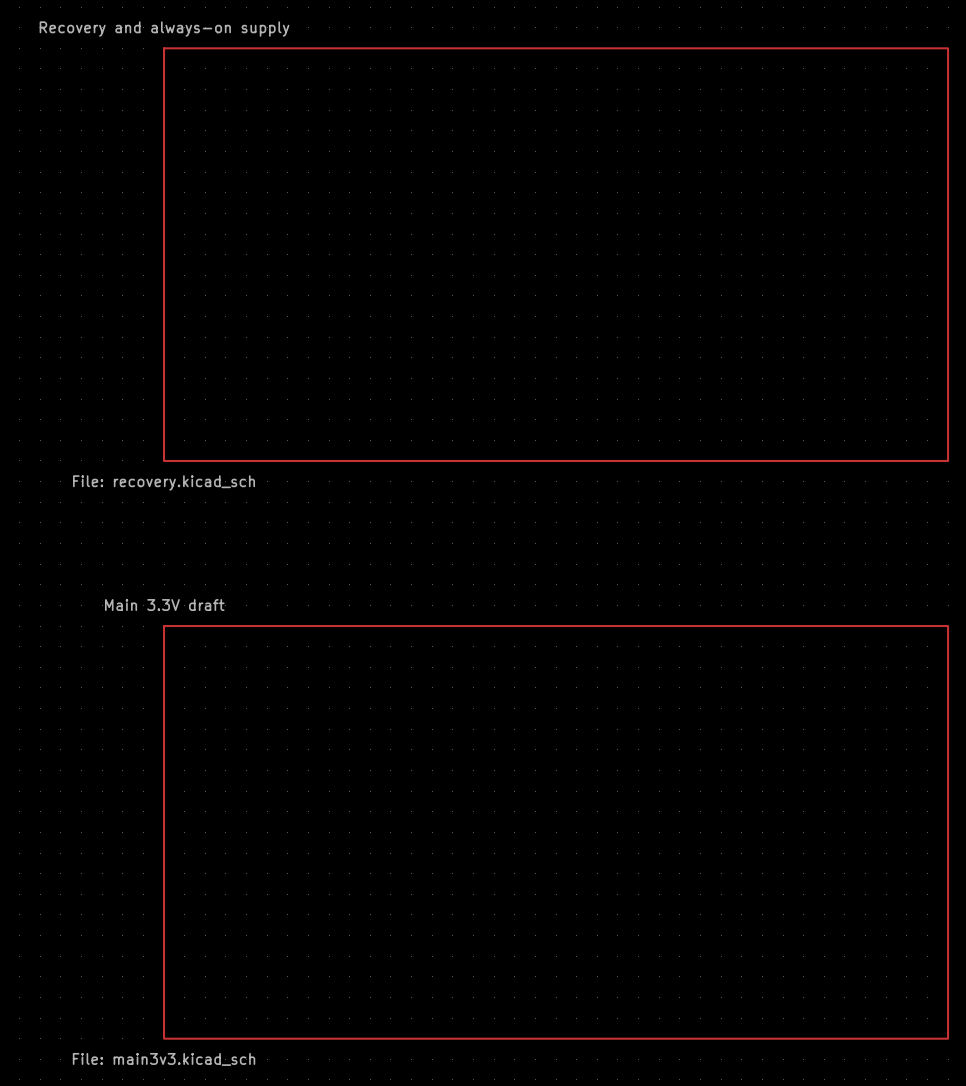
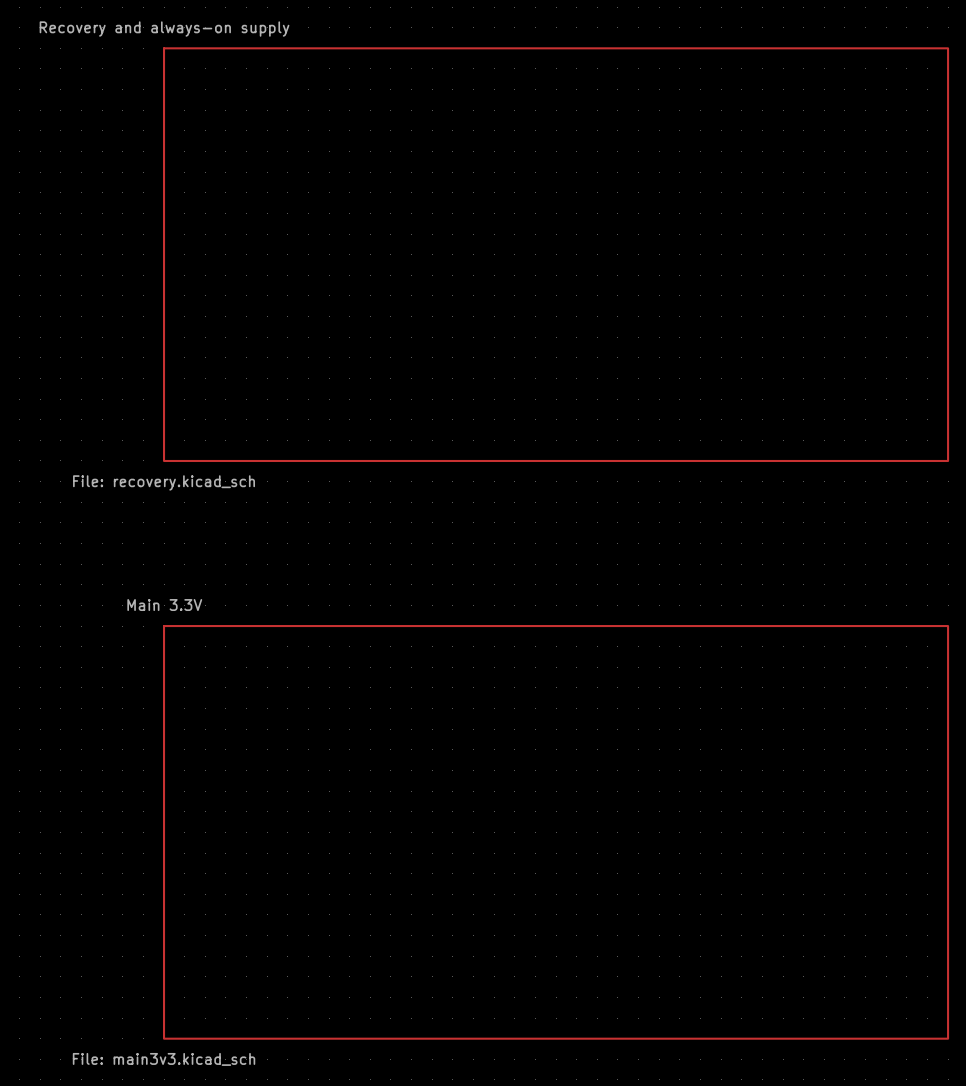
sheet Main 3.3V draft name: Main 3.3V draft (164, 605) -> Main 3.3V (164, 605)

